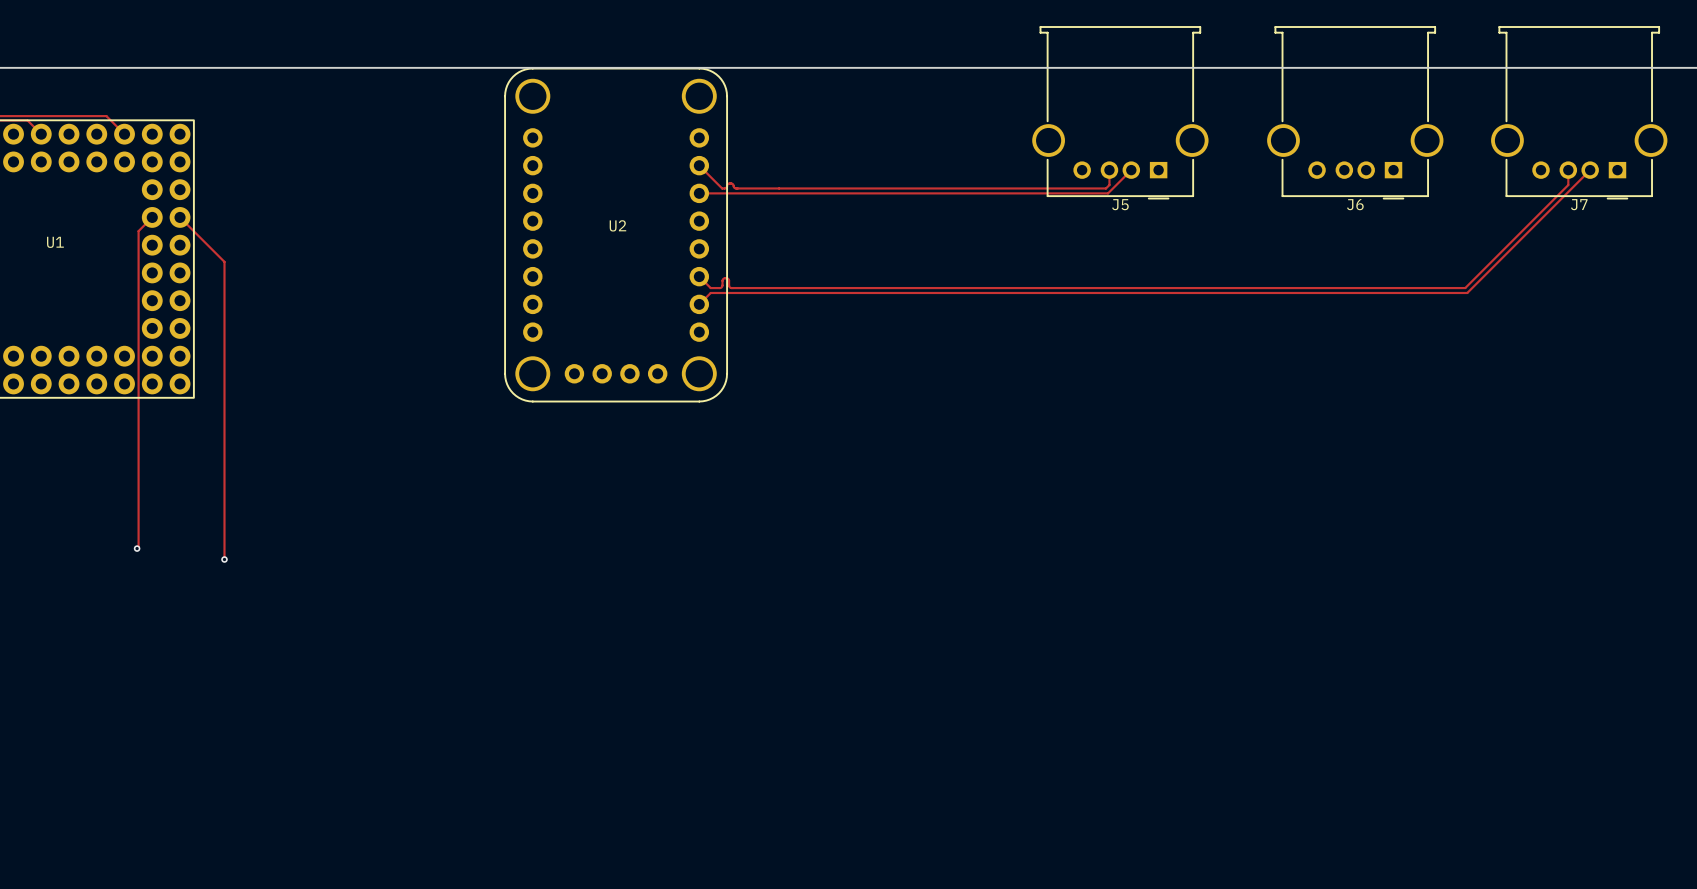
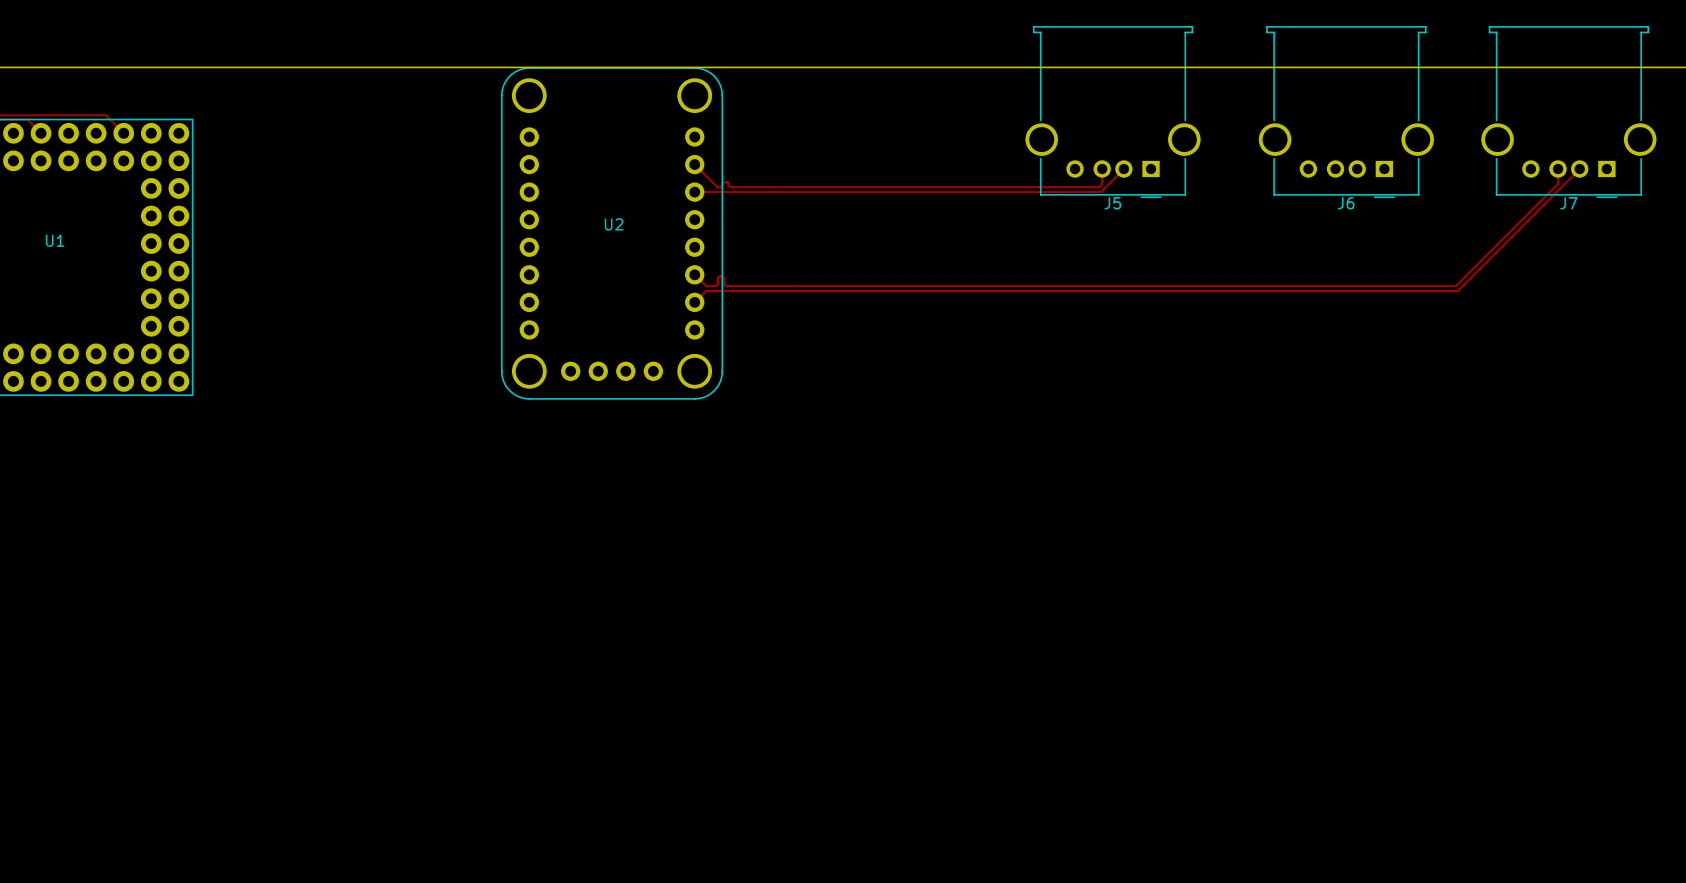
track: (152, 217) (138, 231) (137, 548) -> none
track: (180, 217) (224, 261) (224, 559) -> none
via: (137, 548) -> none
via: (224, 559) -> none

